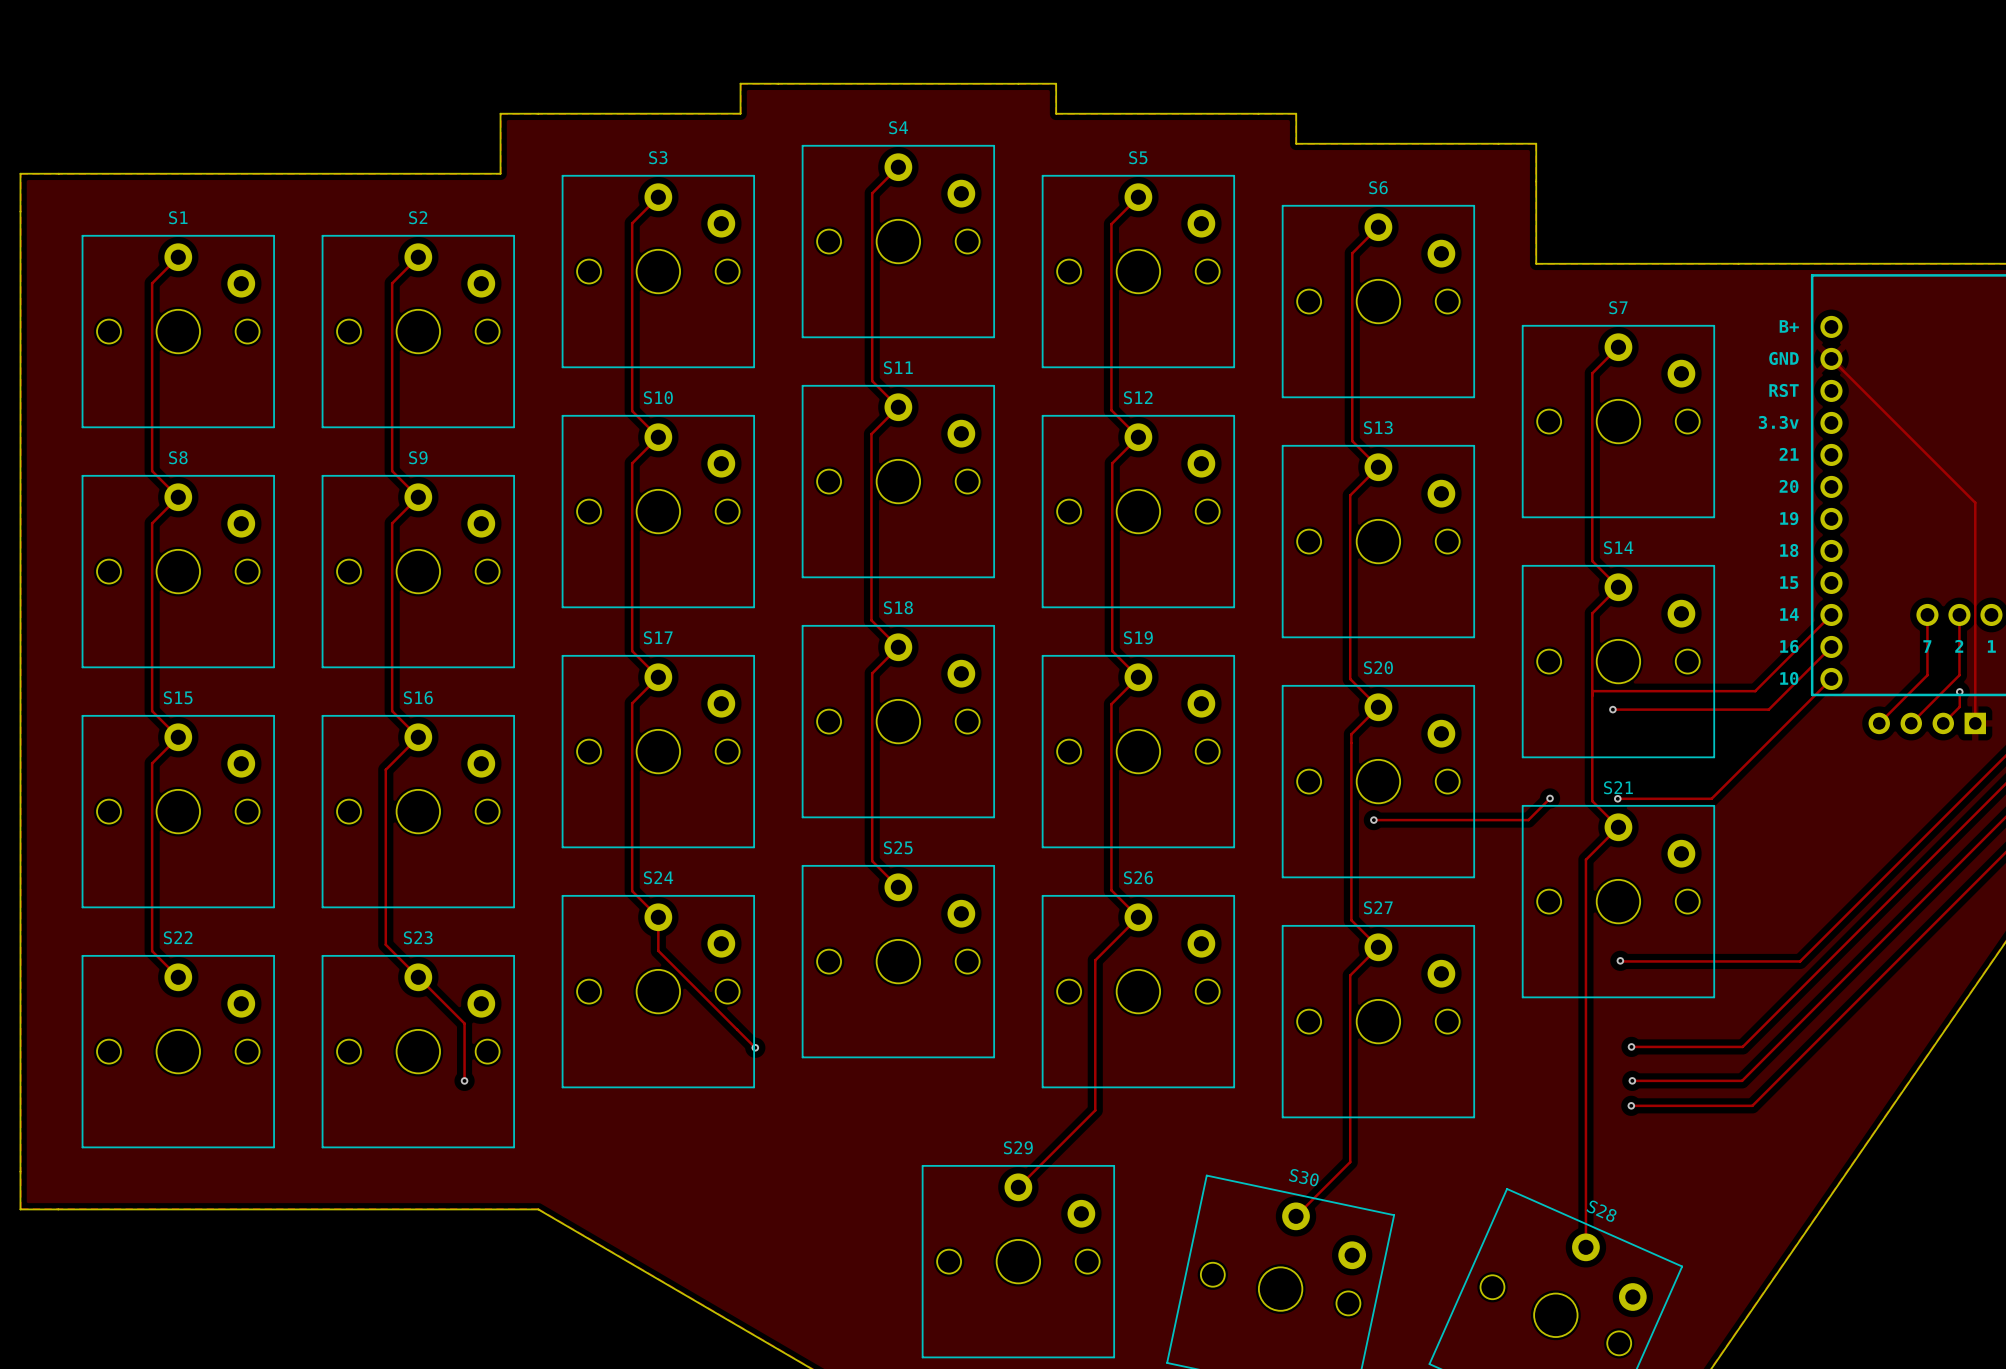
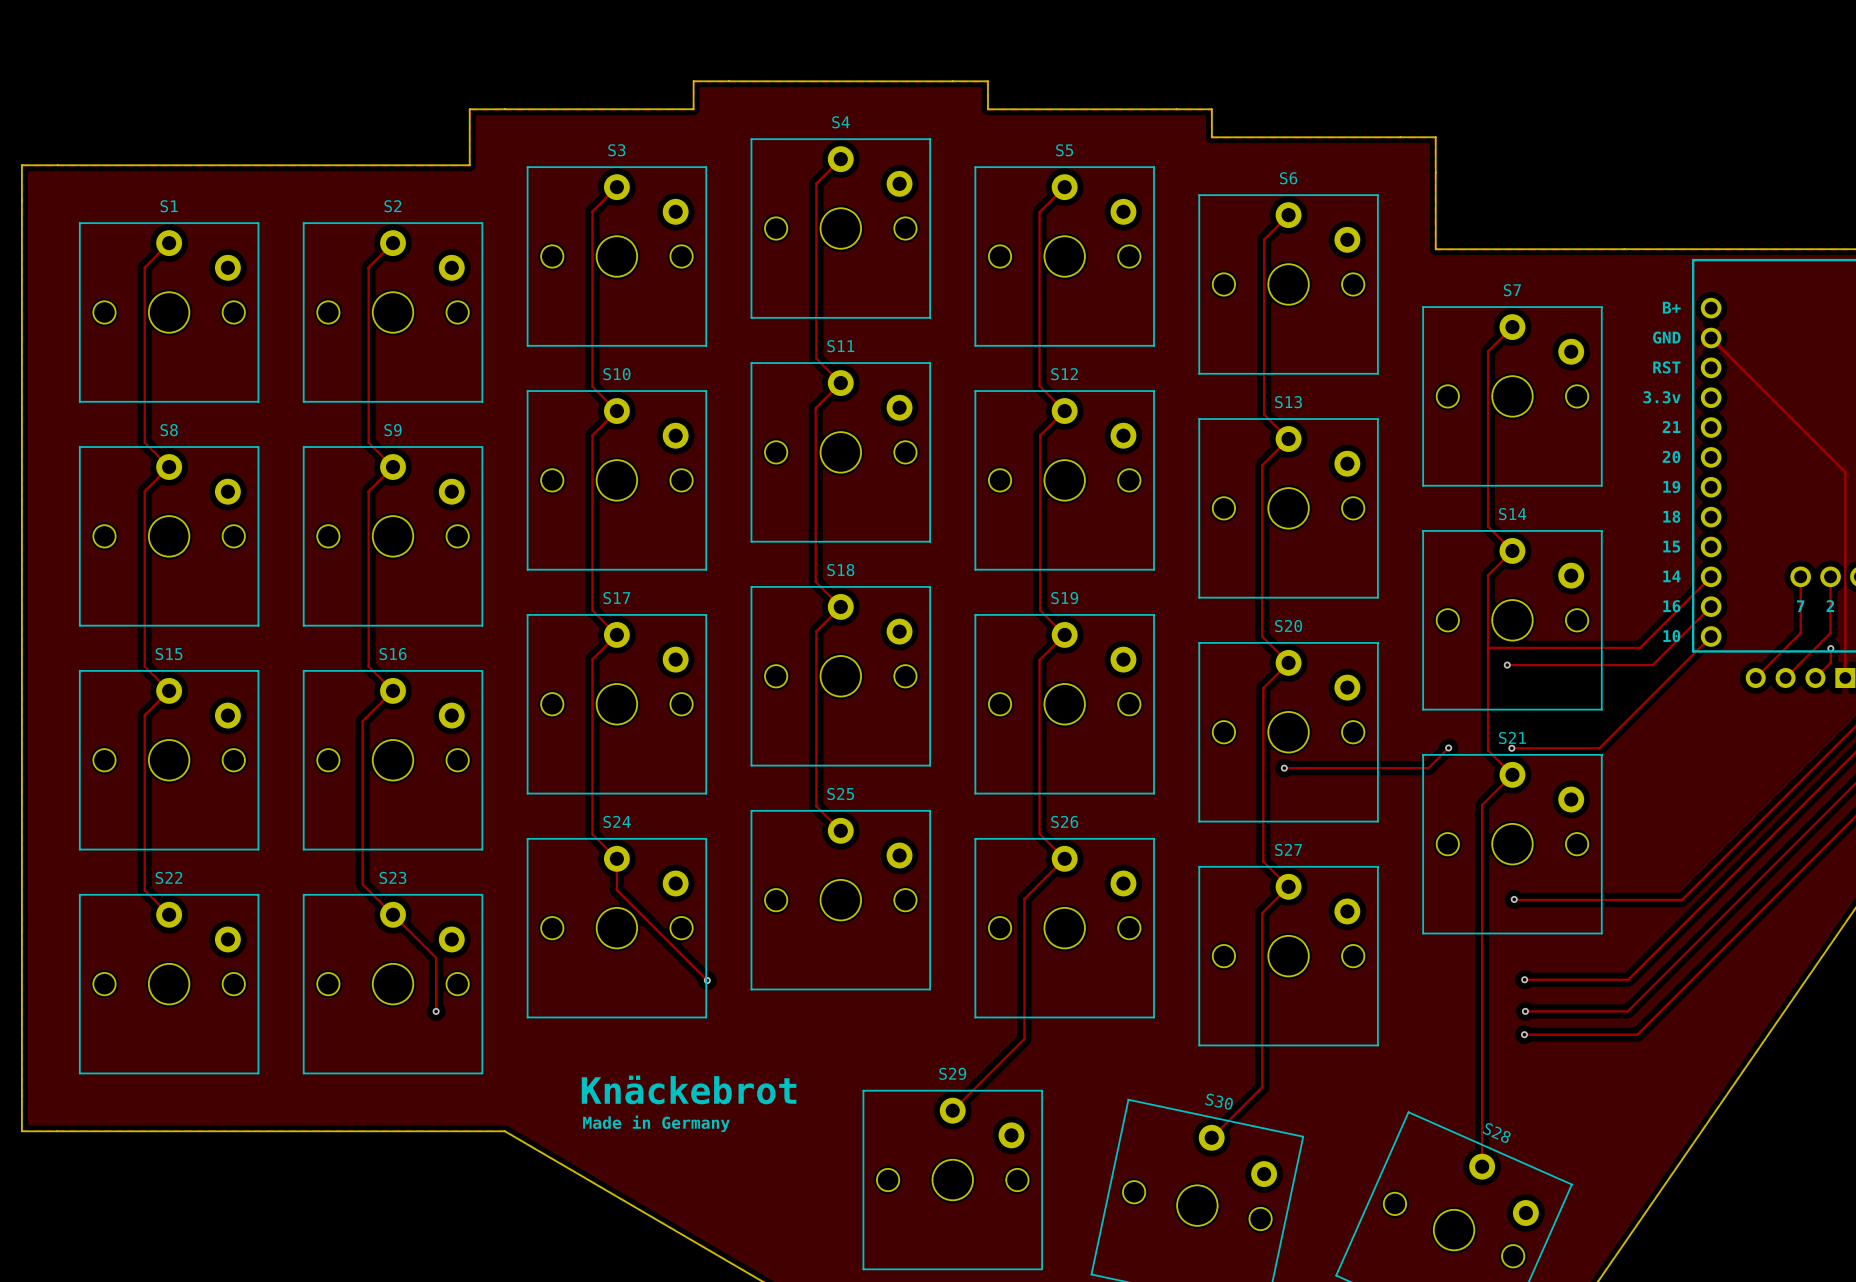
text: none -> Knäckebrot (689, 1089)
text: none -> Made in Germany (656, 1123)

